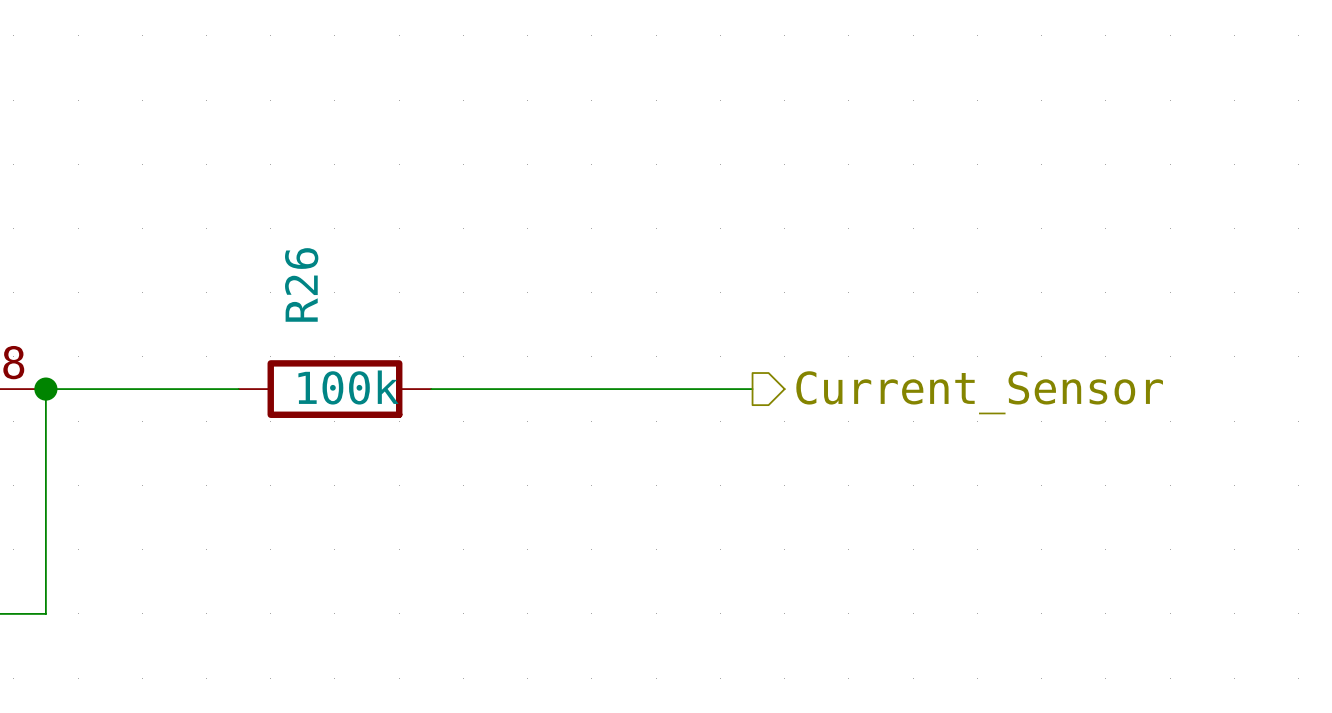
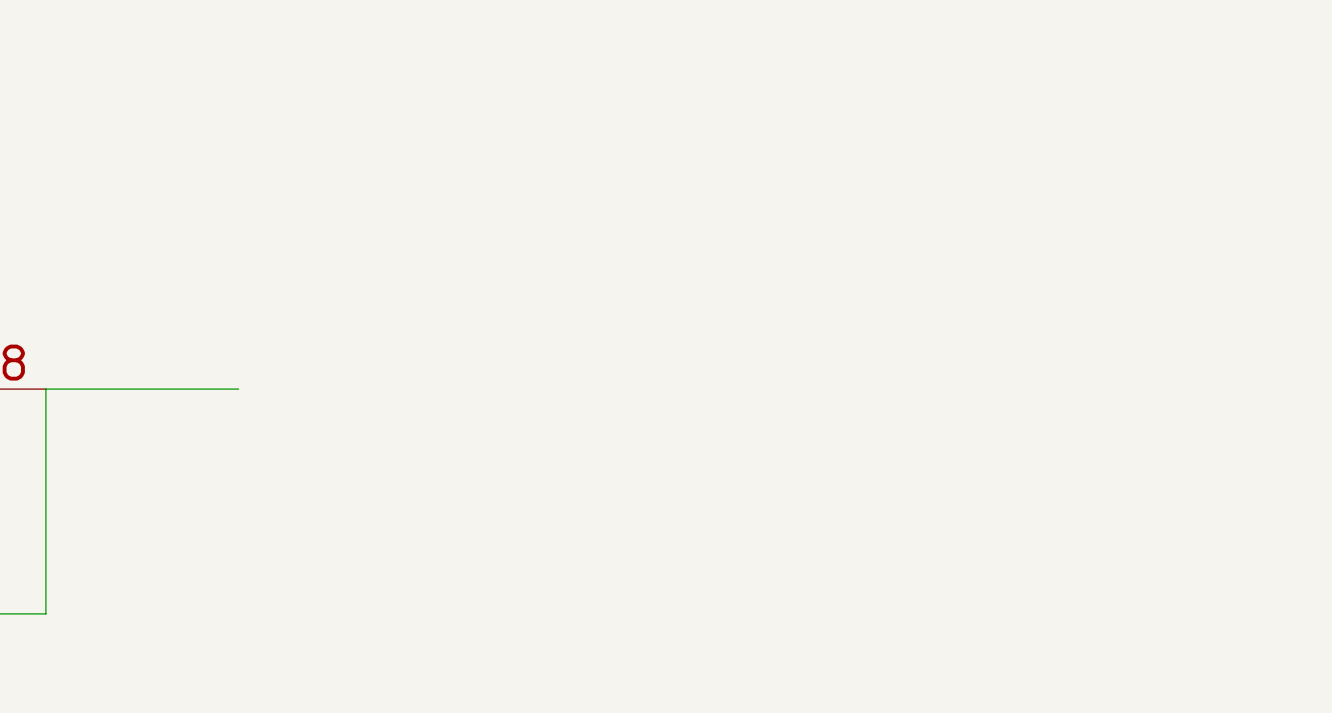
junction: (45, 389) -> none
R26: 100k (334, 389) -> none
wire: (431, 389) (752, 389) -> none
hierarchical label: Current_Sensor (979, 392) -> none

